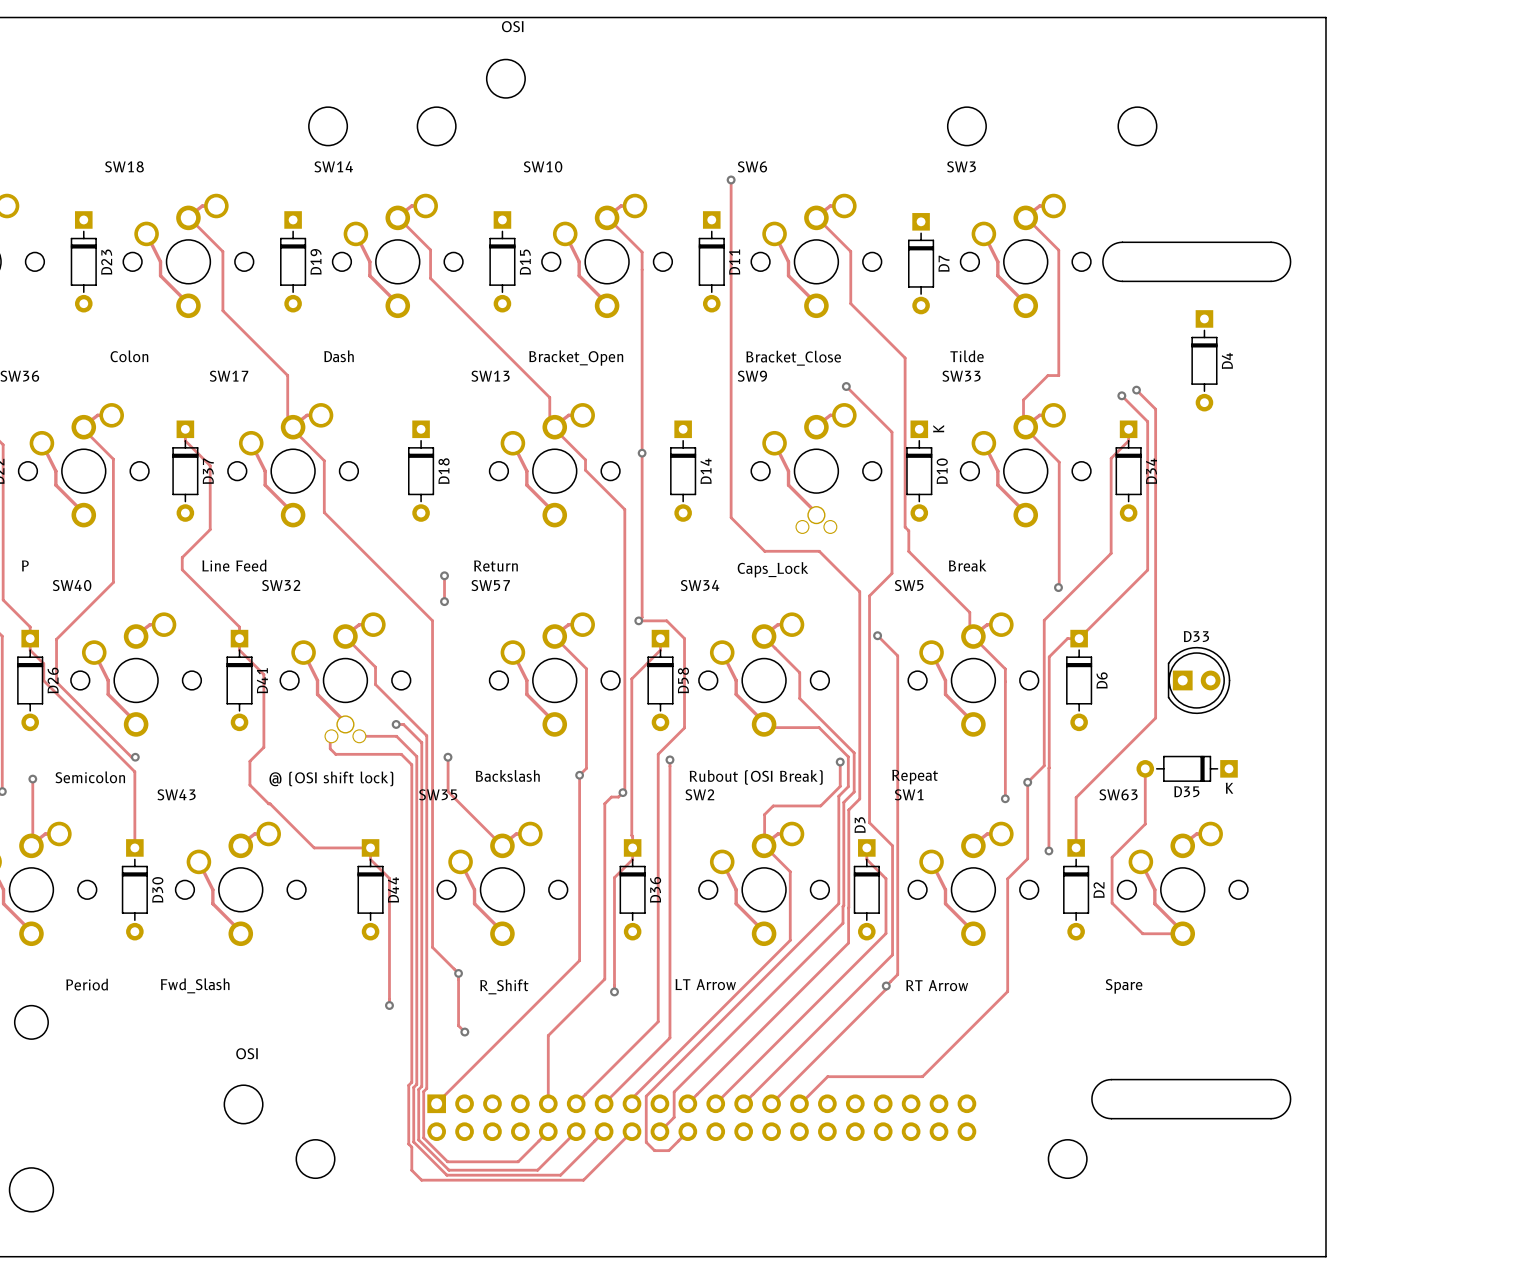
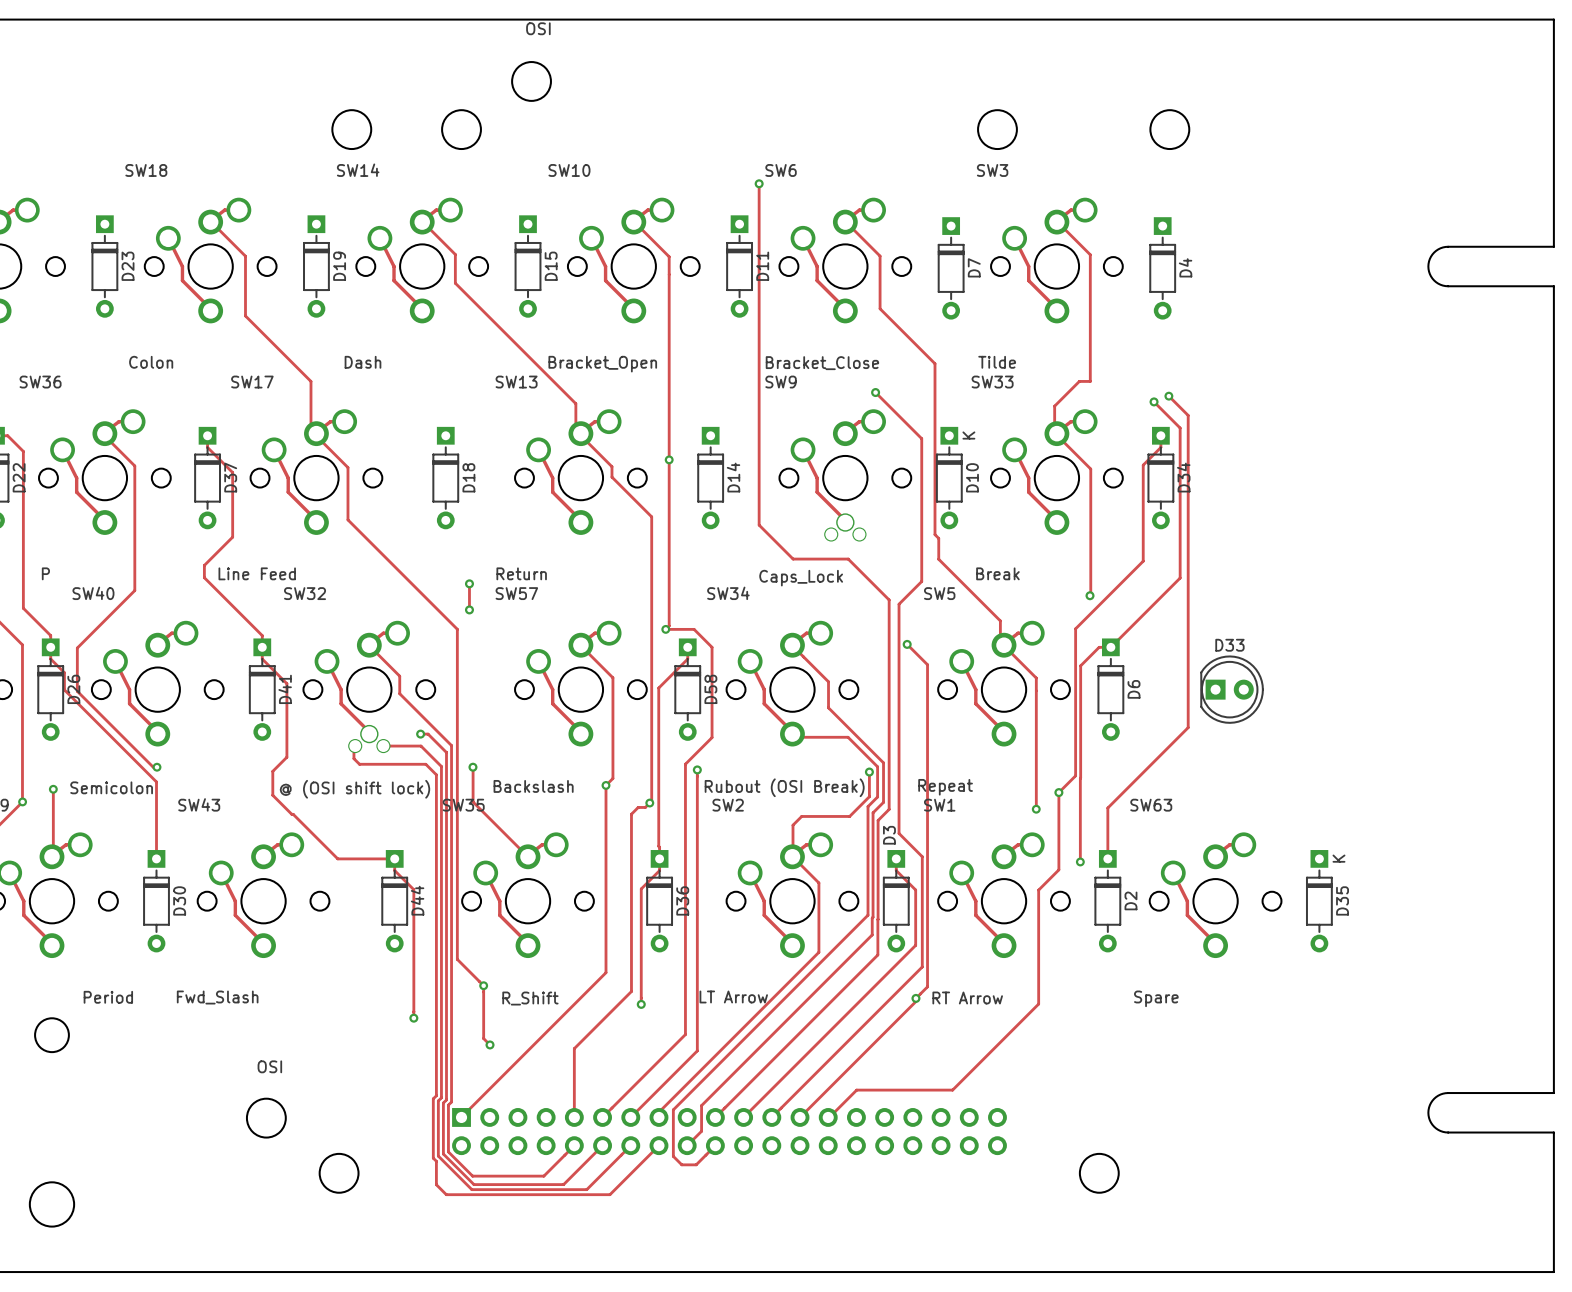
board edge: (1325, 17) (1325, 1256) -> (1360, 19) (1553, 19) (1553, 246) (1445, 246) (1434, 252) (1429, 258) (1428, 266) (1429, 274) (1434, 280) (1445, 286) (1553, 286) (1553, 1093) (1445, 1093) (1438, 1095) (1432, 1100) (1428, 1112) (1432, 1124) (1438, 1129) (1445, 1132) (1553, 1132) (1553, 1272) (1360, 1272)
board edge: (1122, 242) (1273, 242) (1286, 249) (1290, 264) (1284, 275) (1273, 281) (1119, 281) (1106, 273) (1103, 259) (1108, 248) (1122, 242) -> none
D4 position: (1204, 360) -> (1162, 268)
track: (1145, 768) (1145, 824) (1112, 857) (1112, 903) (1142, 933) (1177, 933) -> none
D35 rotation: 0° (1187, 768) -> 90° counterclockwise (1319, 901)
D35 position: (1187, 768) -> (1319, 901)
board edge: (1111, 1079) (1273, 1079) (1286, 1087) (1290, 1101) (1284, 1112) (1273, 1118) (1108, 1118) (1095, 1111) (1091, 1099) (1097, 1085) (1111, 1079) -> none

